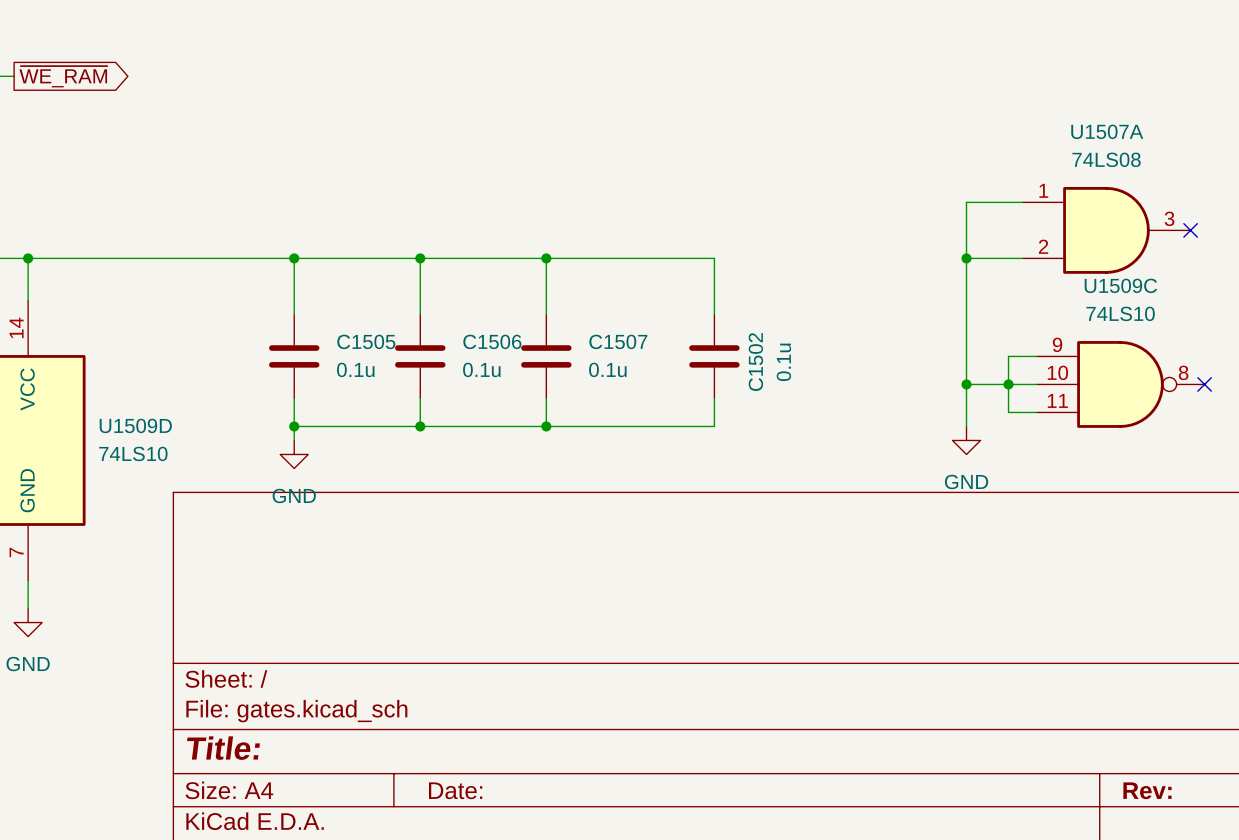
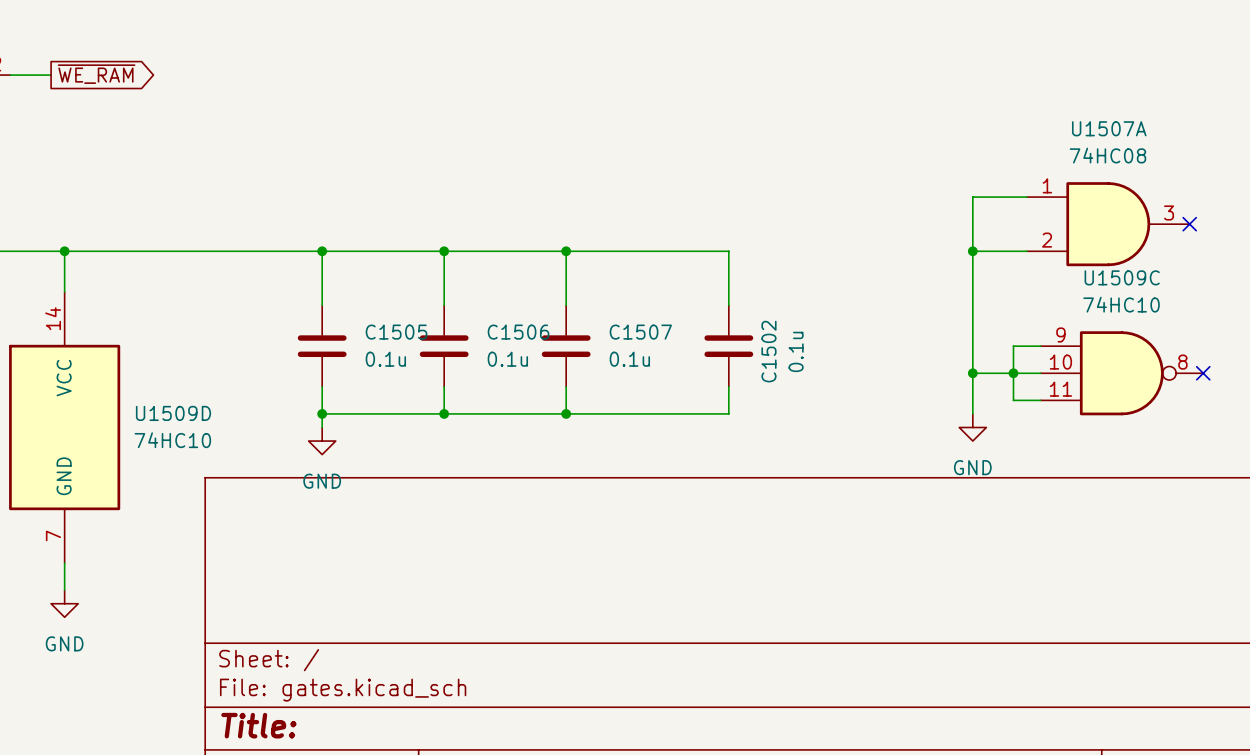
U1507A value: 74LS08 (1106, 159) -> 74HC08 (1107, 155)
U1509C value: 74LS10 (1120, 313) -> 74HC10 (1121, 304)
U1509D value: 74LS10 (133, 453) -> 74HC10 (172, 440)

